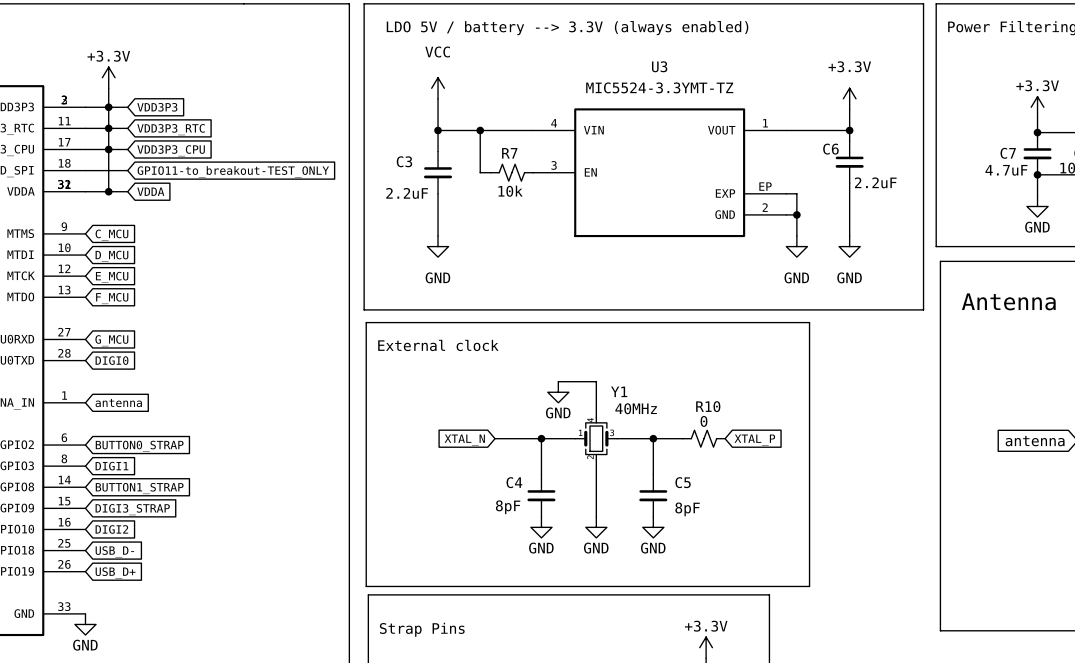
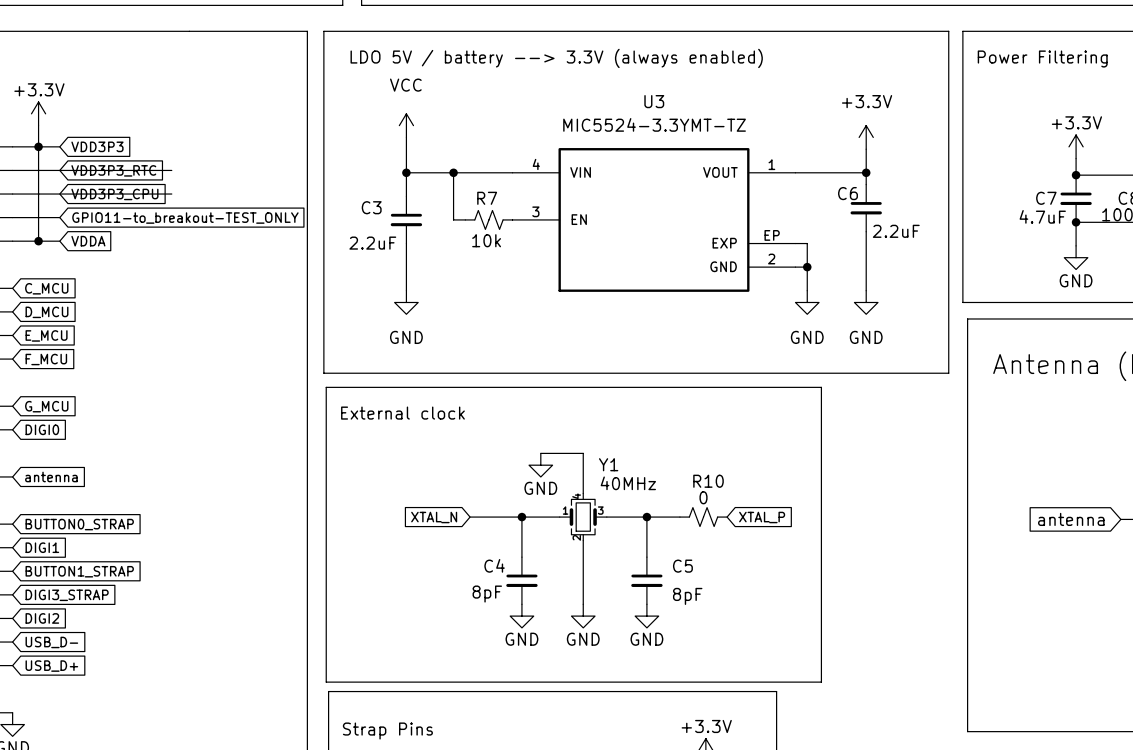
junction: (108, 128) -> none
wire: none -> (59, 170) (171, 170)
junction: (108, 149) -> none
wire: none -> (59, 194) (171, 194)

